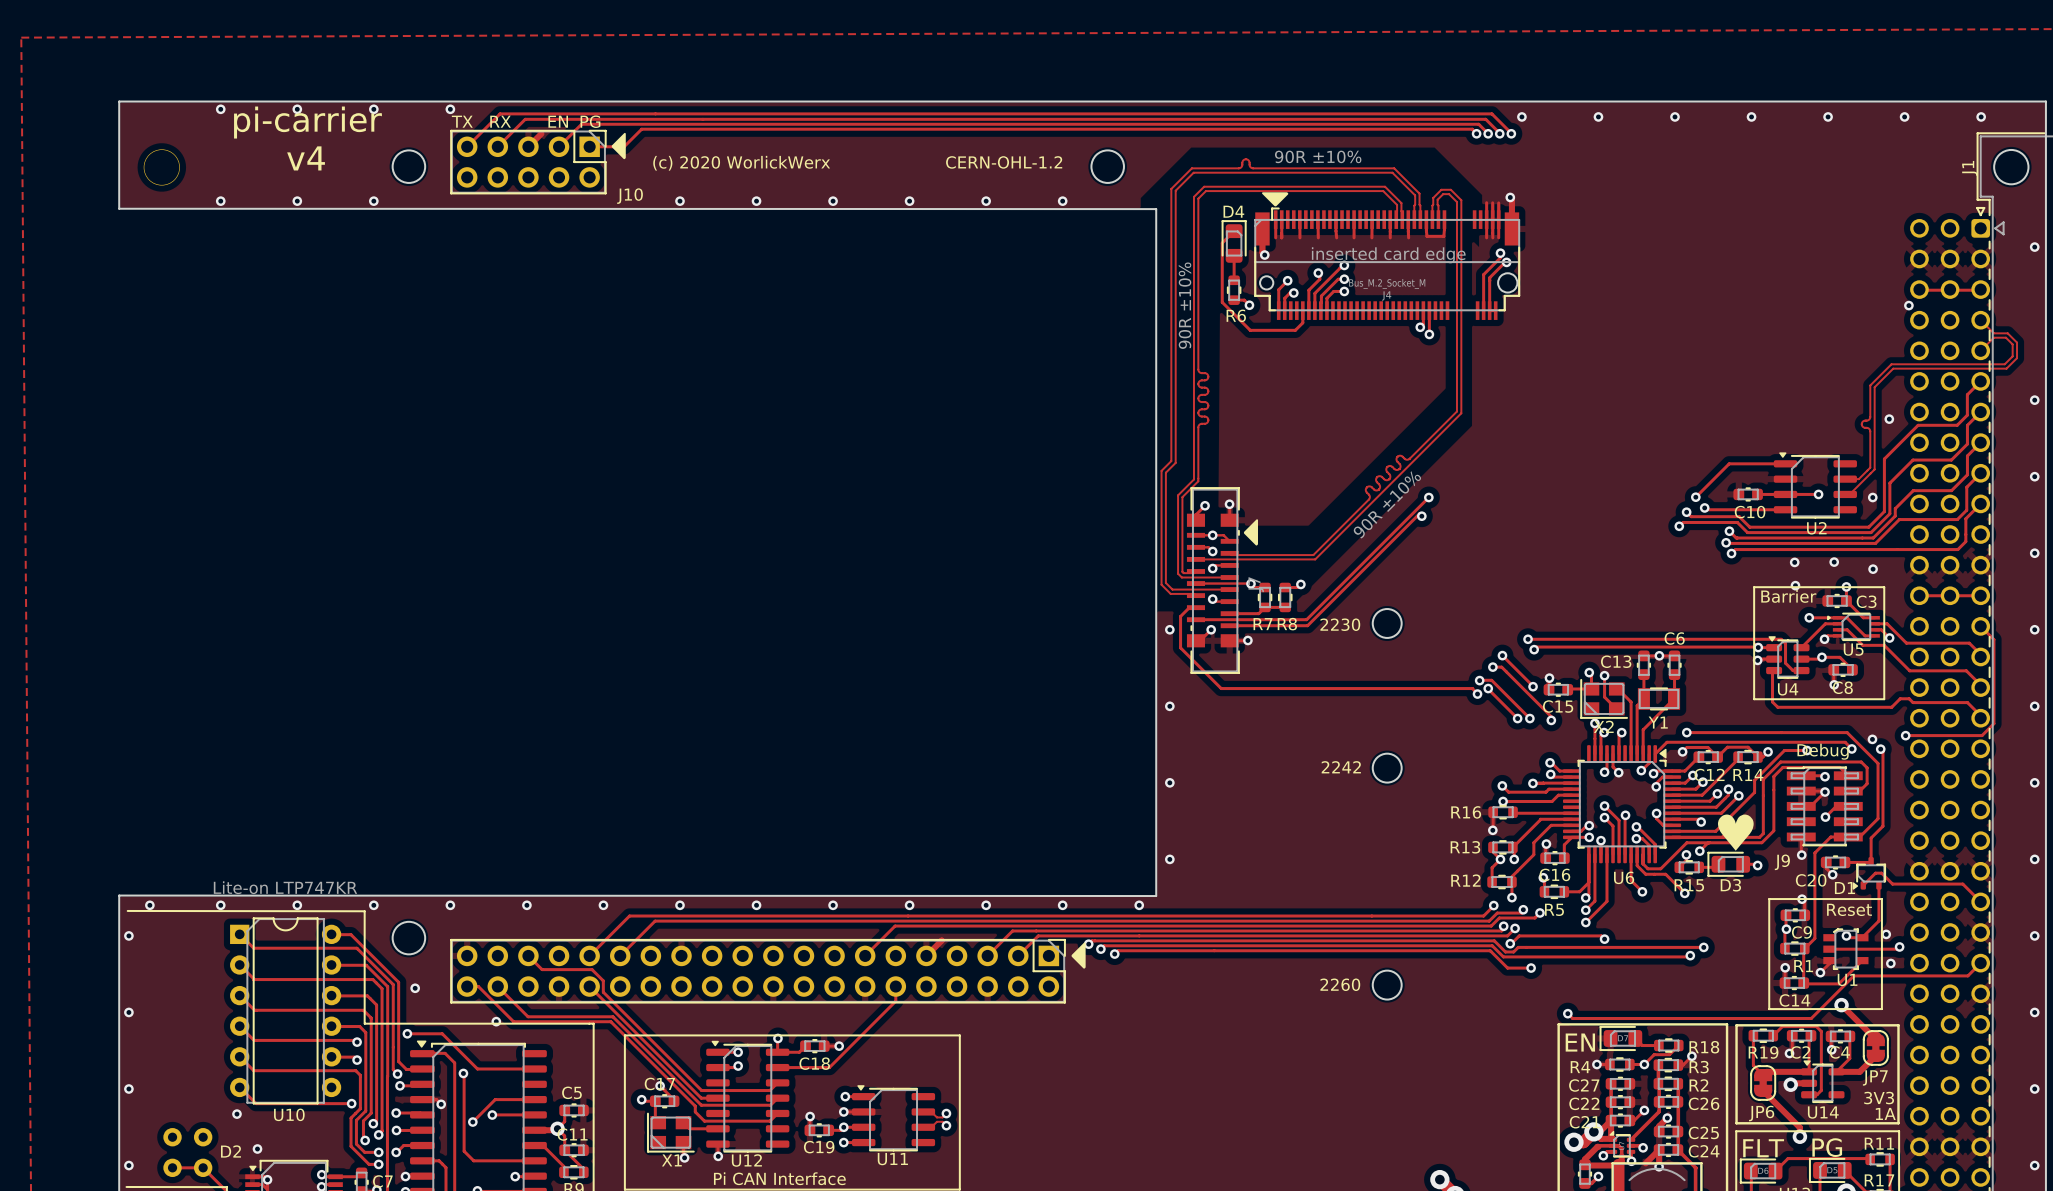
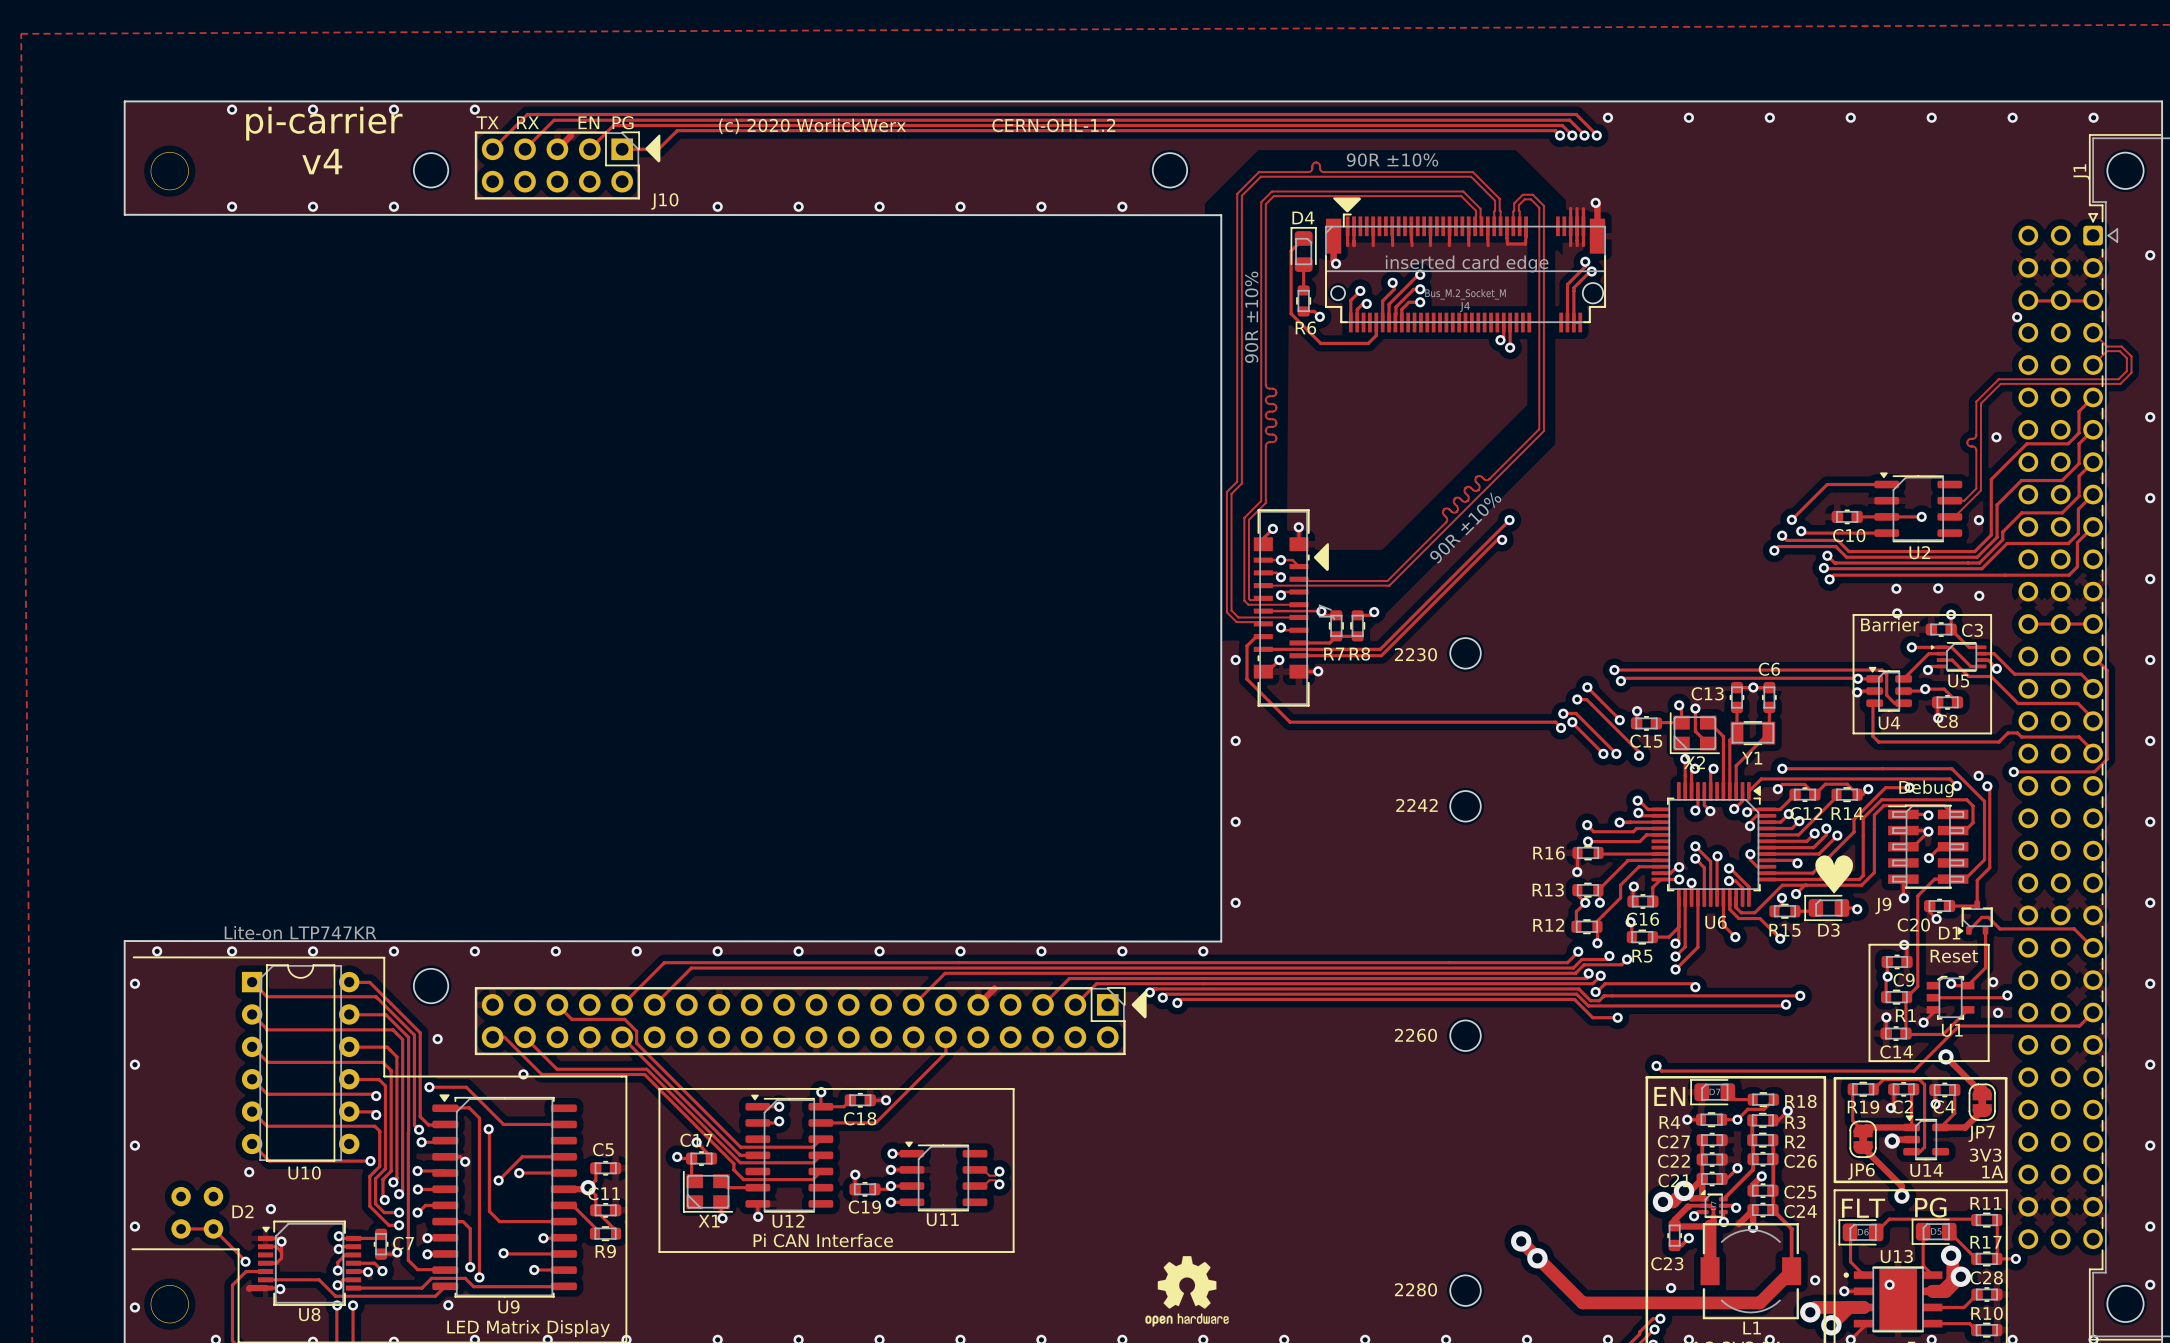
text position: CERN-OHL-1.2 (1004, 162) -> CERN-OHL-1.2 (1053, 125)
text position: (c) 2020 WorlickWerx (741, 163) -> (c) 2020 WorlickWerx (812, 126)

